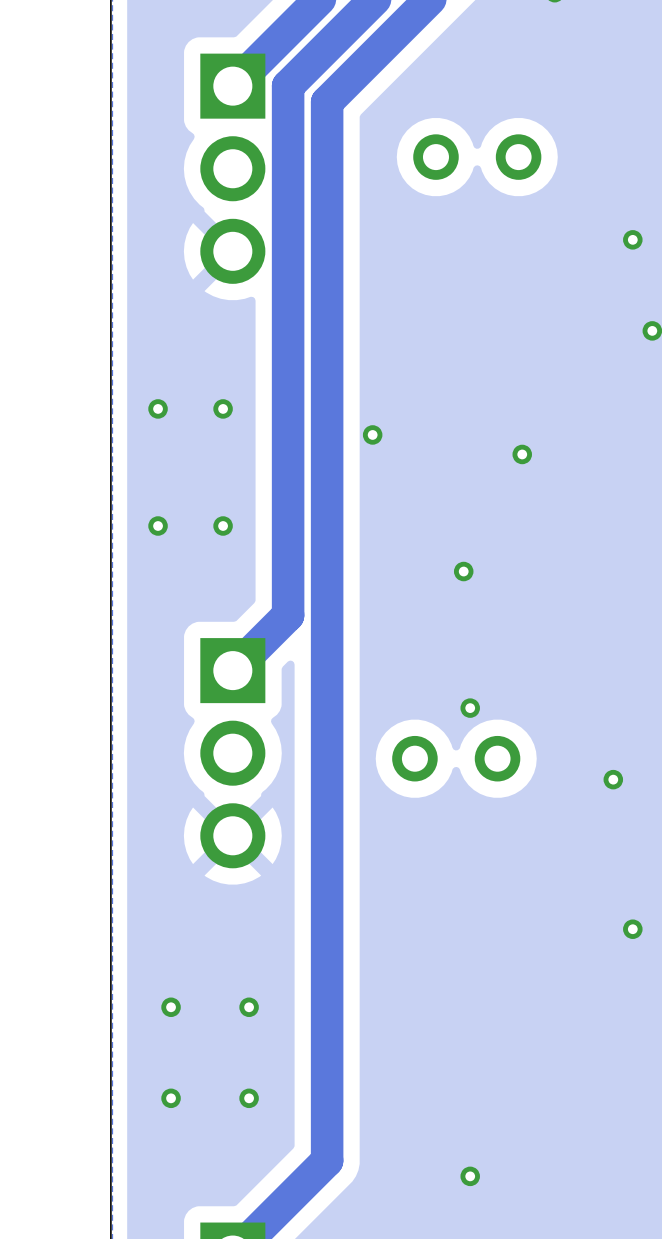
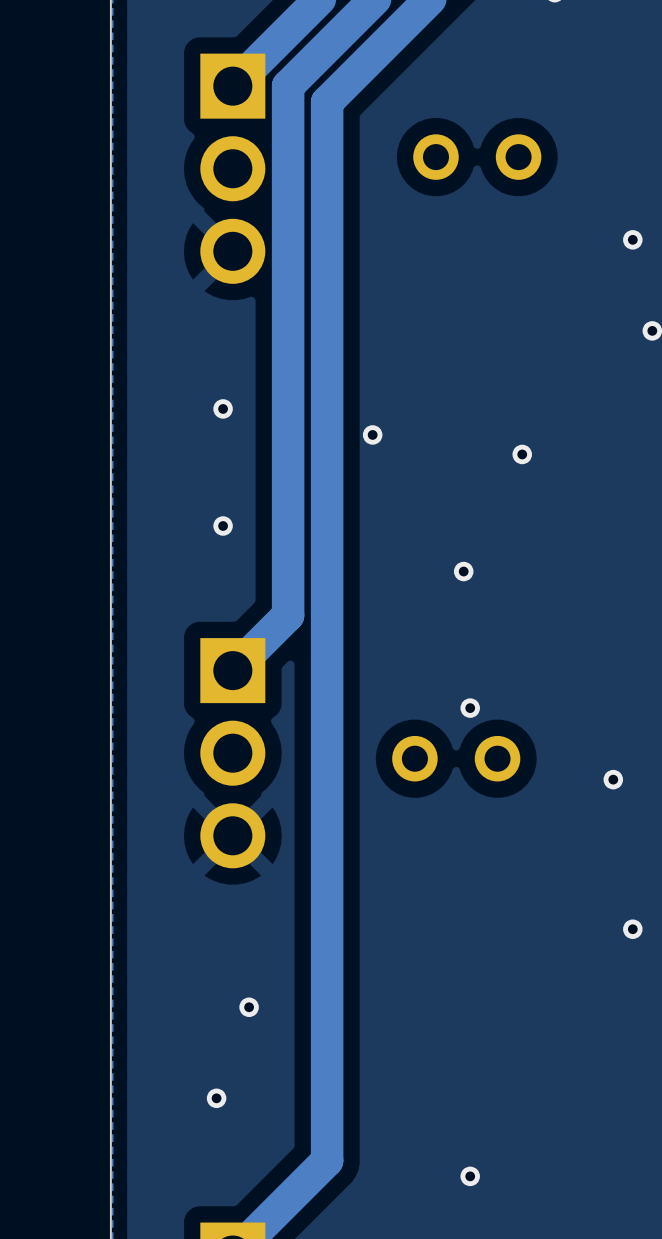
via: (158, 408) -> none
via: (158, 526) -> none
via: (171, 1007) -> none
via: (171, 1098) -> none
via: none -> (216, 1098)
via: (249, 1098) -> none

